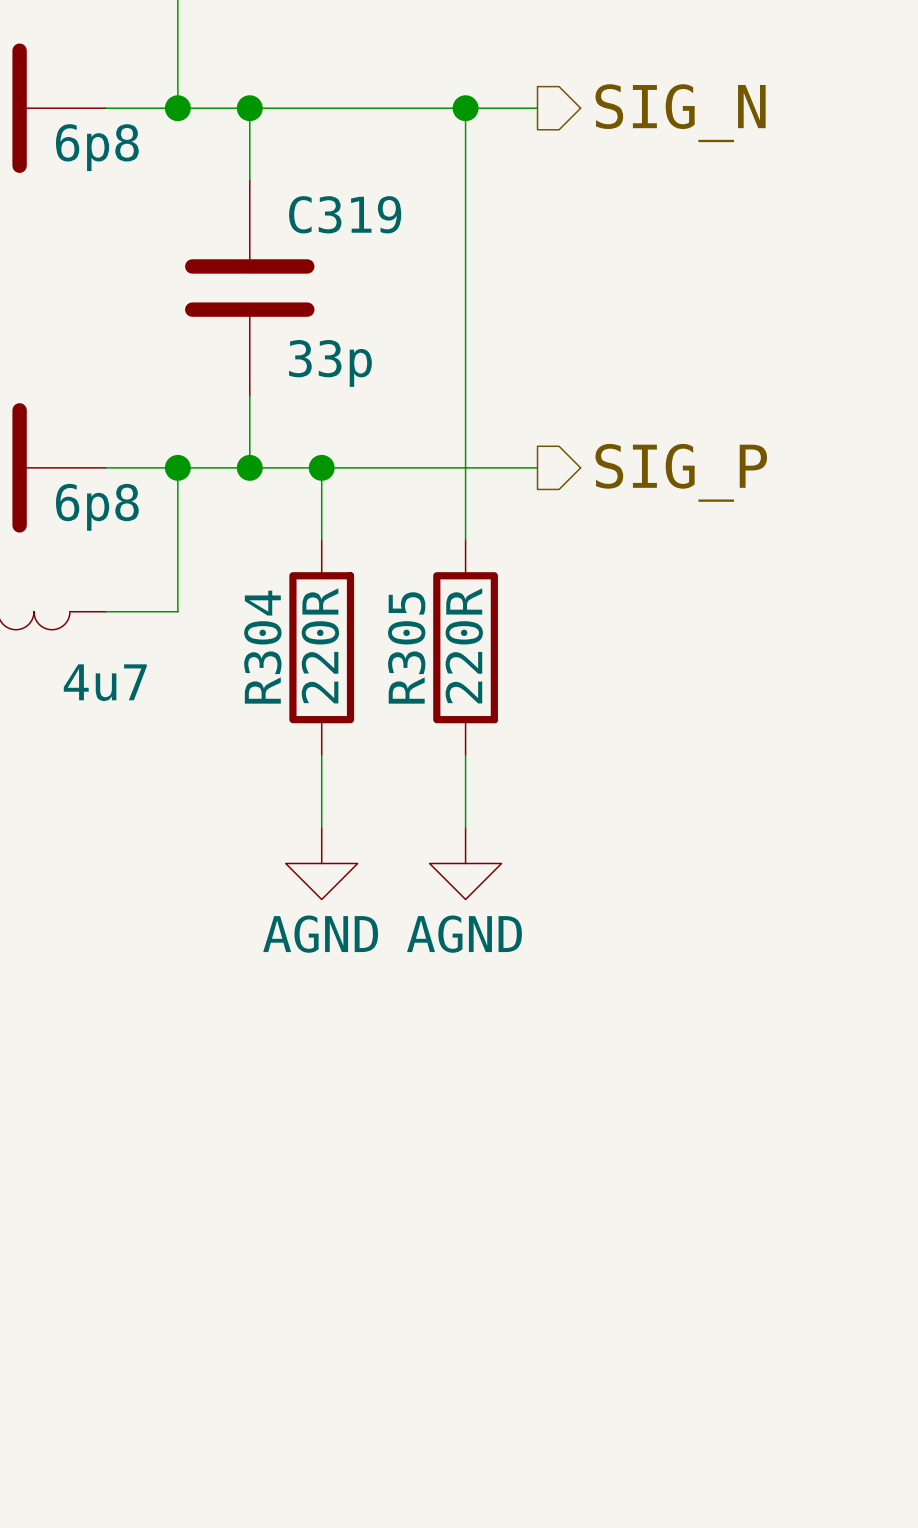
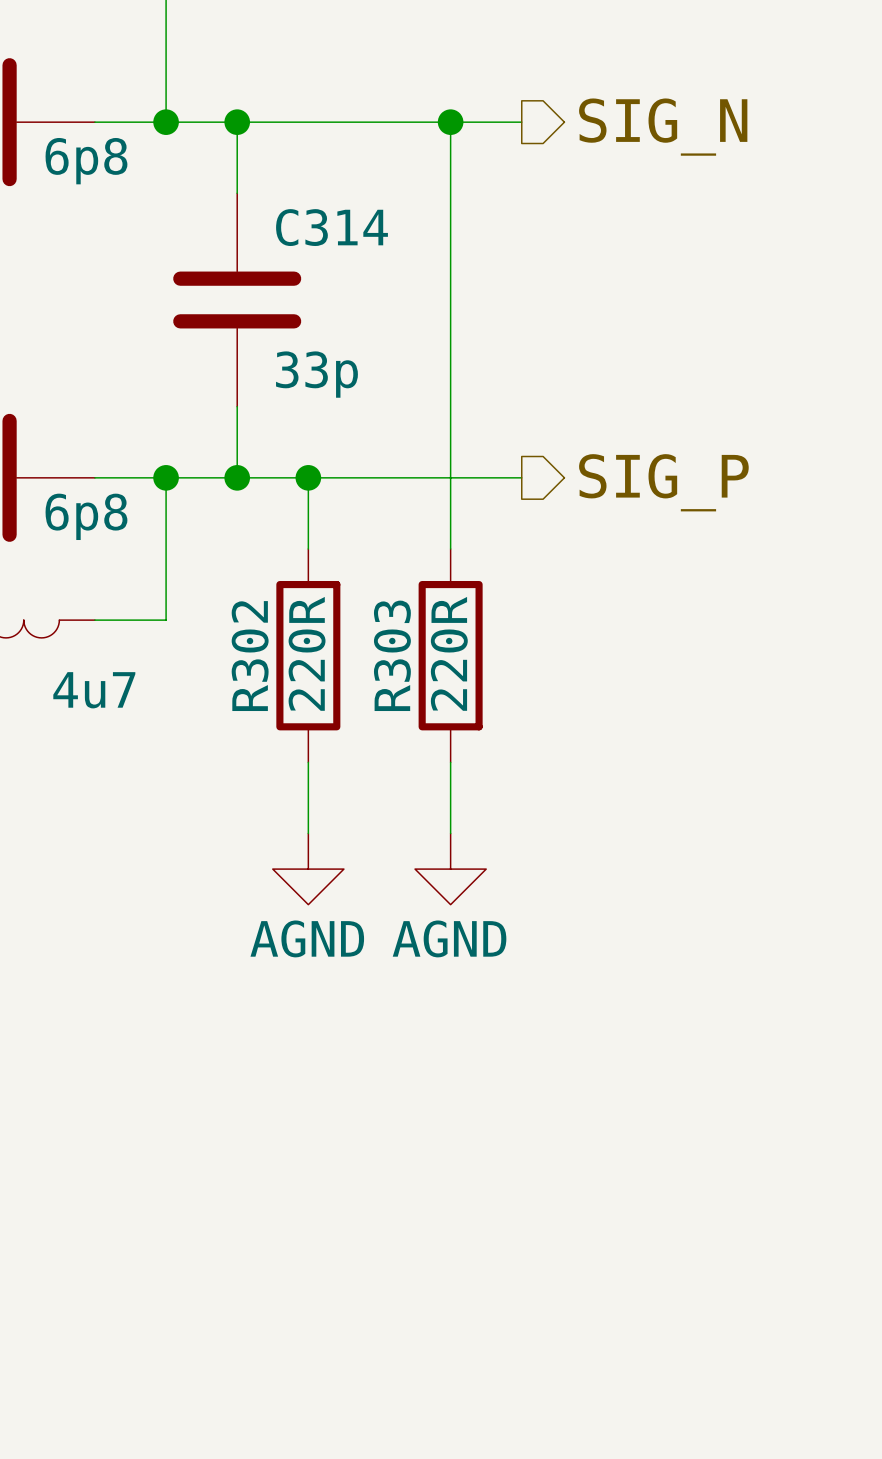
C319 name: C319 (345, 214) -> C314 (332, 227)
R304 name: R304 (262, 647) -> R302 (250, 656)
R305 name: R305 (406, 647) -> R303 (392, 655)

